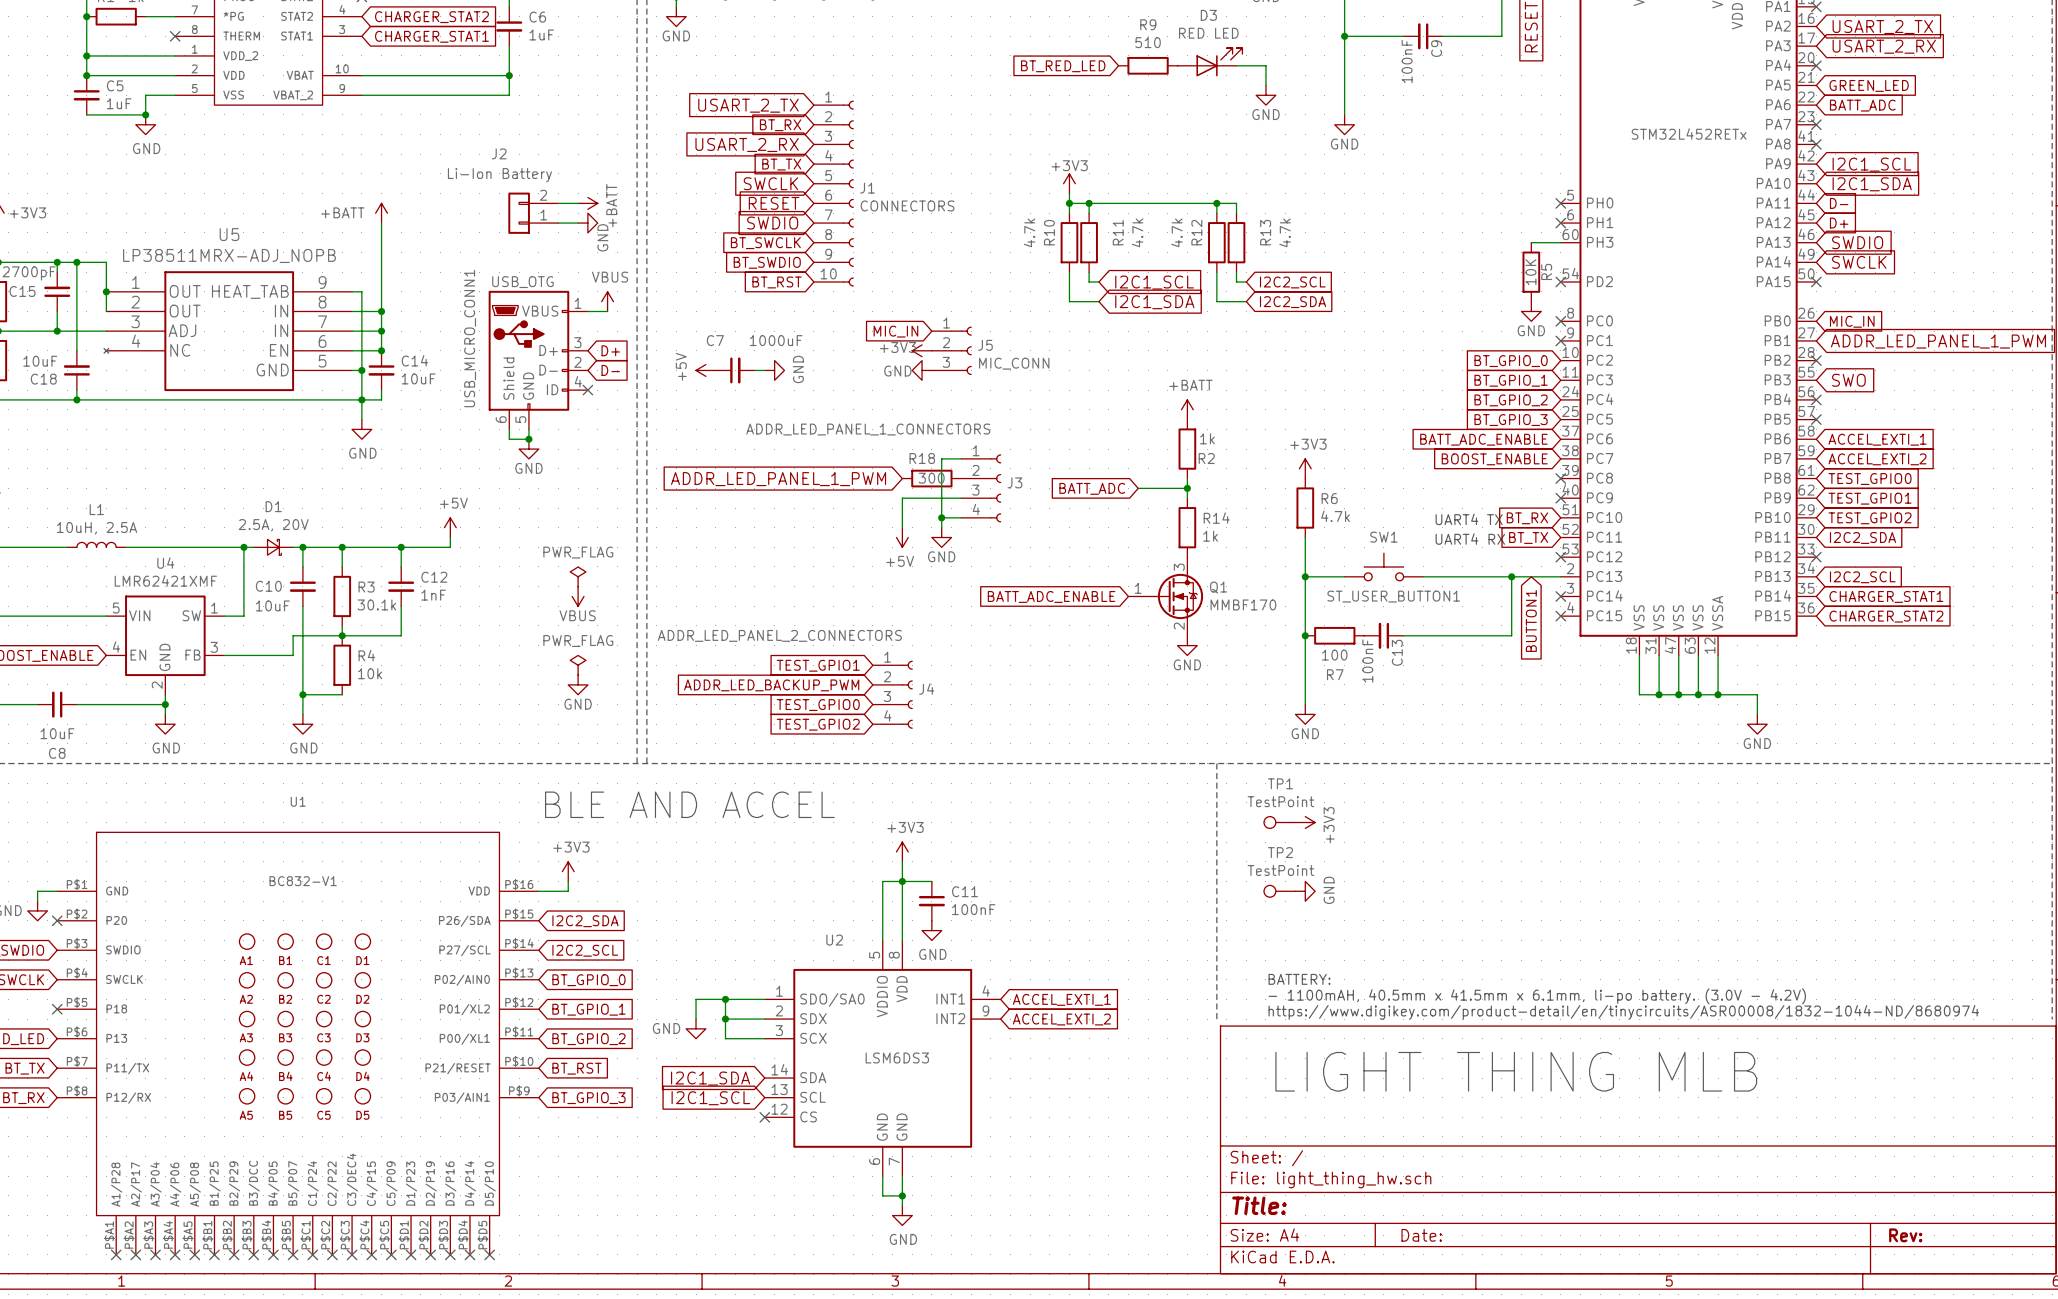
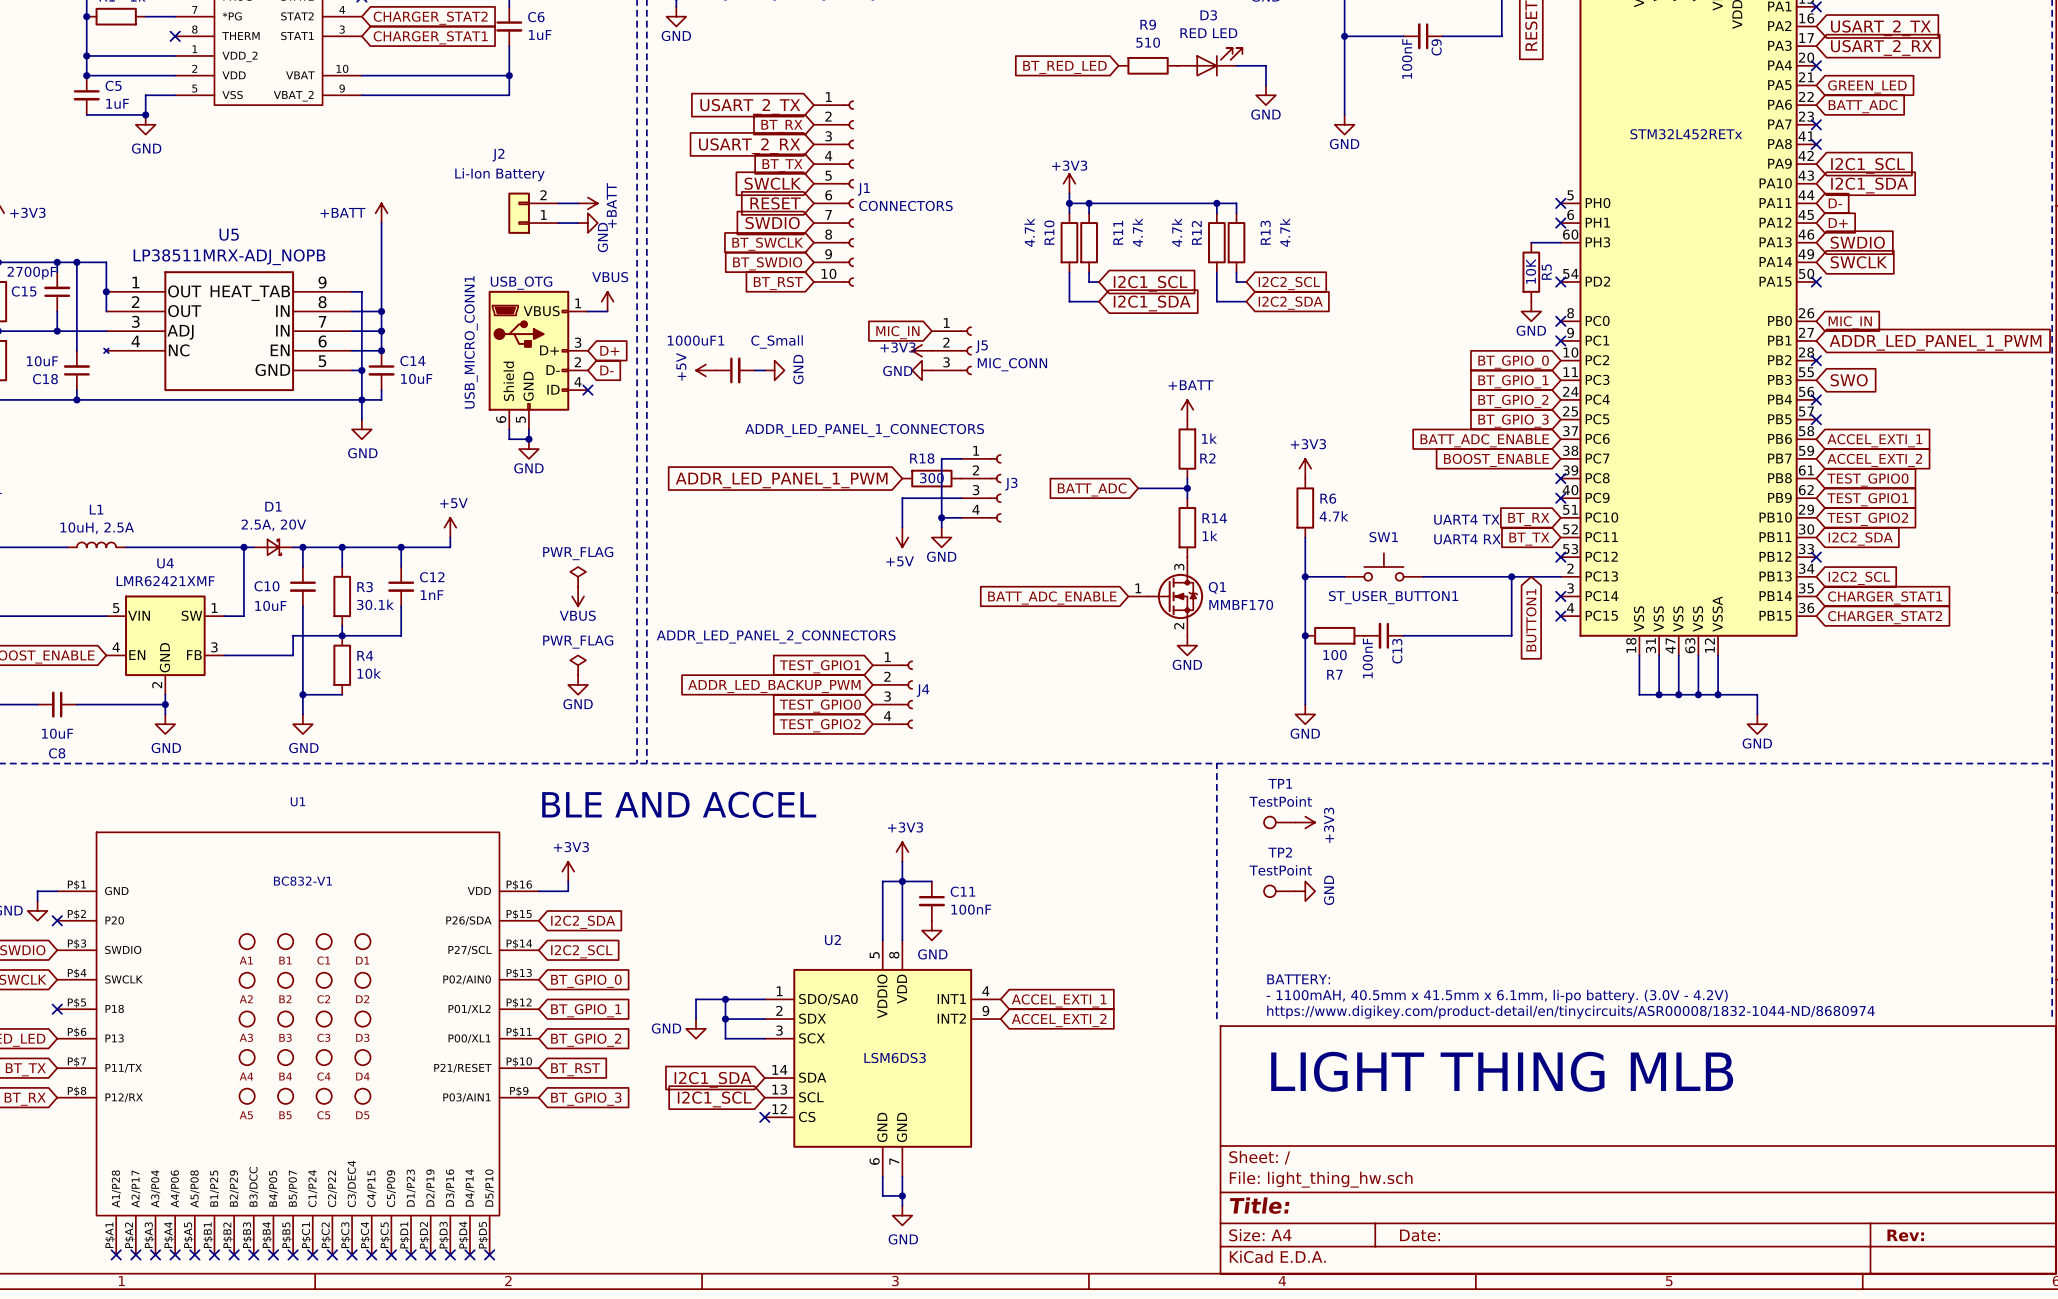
C7 name: C7 (715, 340) -> 1000uF1 (696, 340)
C7 value: 1000uF (776, 340) -> C_Small (777, 341)

